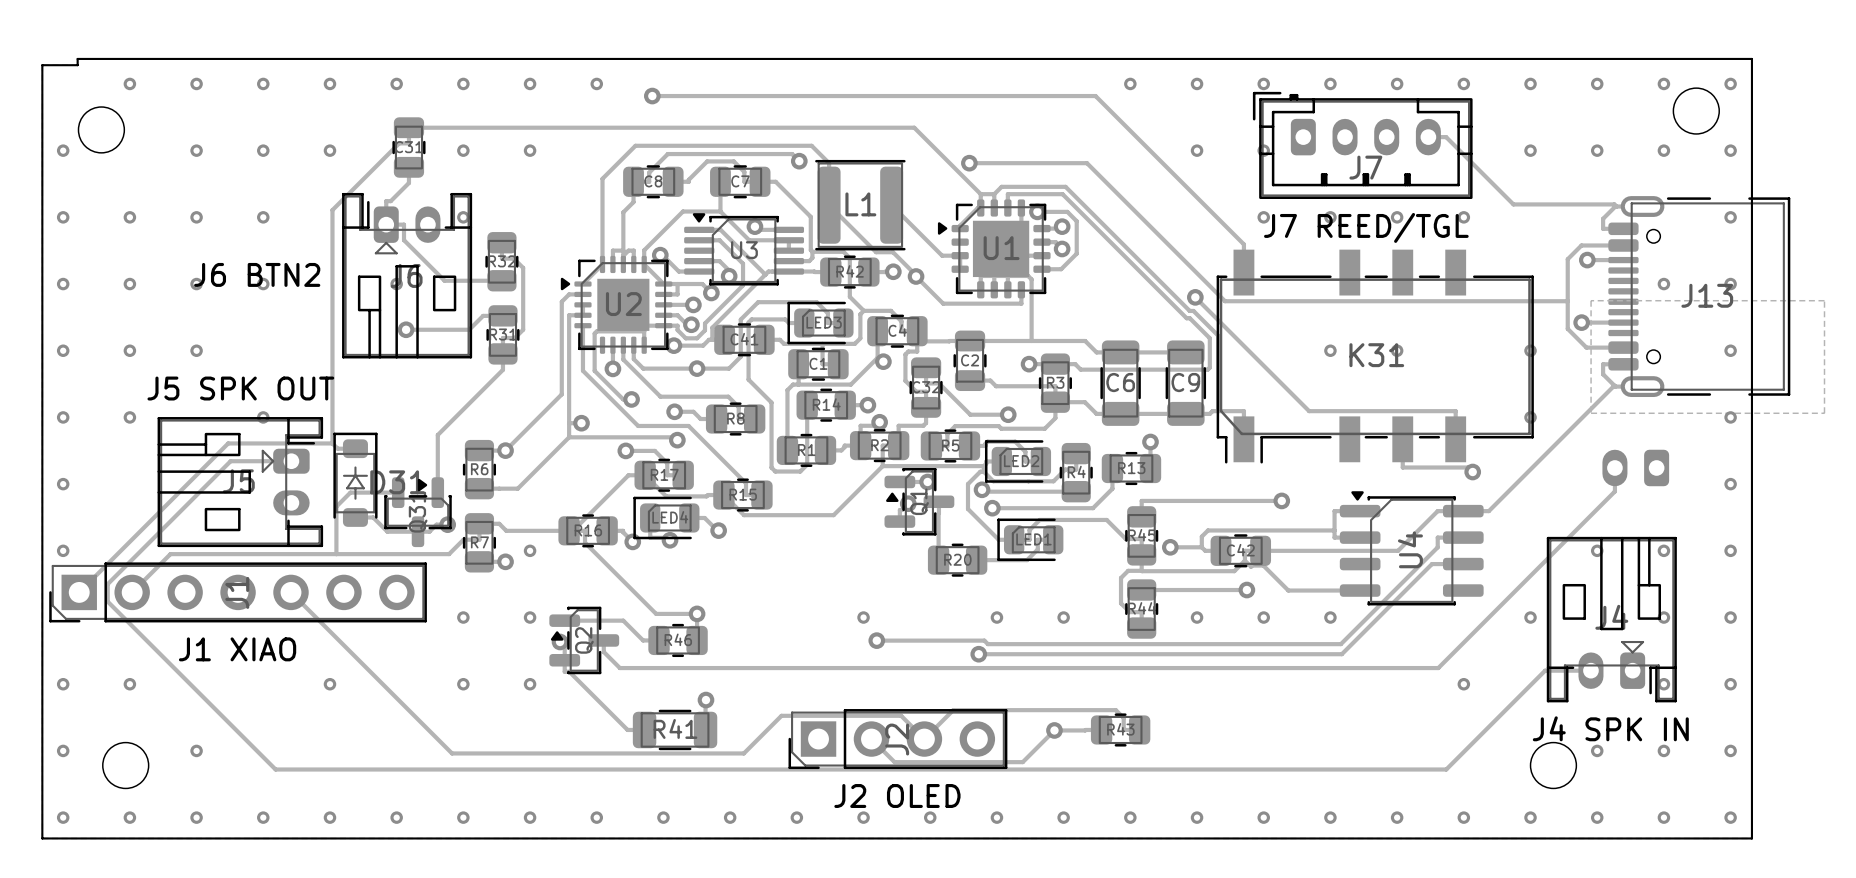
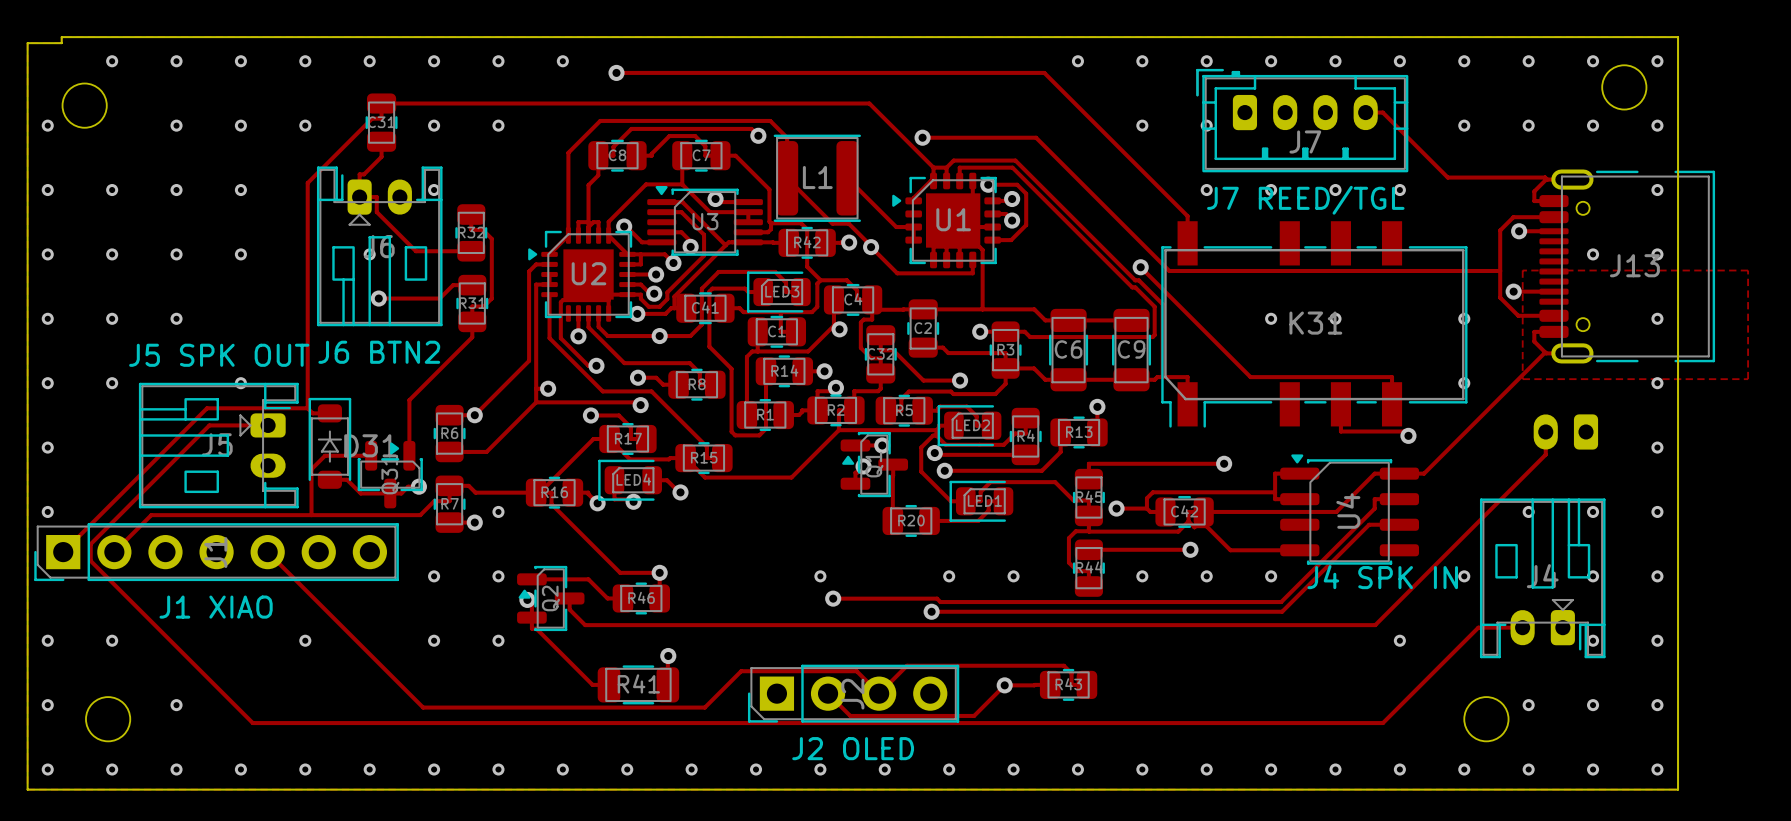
text position: J6 BTN2 (257, 274) -> J6 BTN2 (379, 352)
text position: J4 SPK IN (1610, 728) -> J4 SPK IN (1382, 577)

